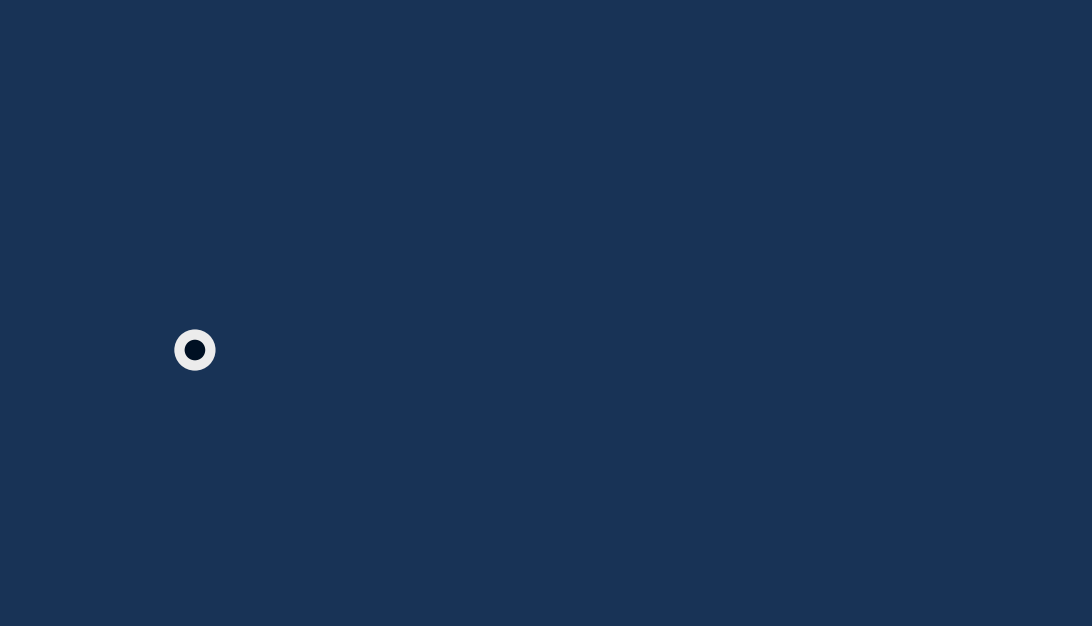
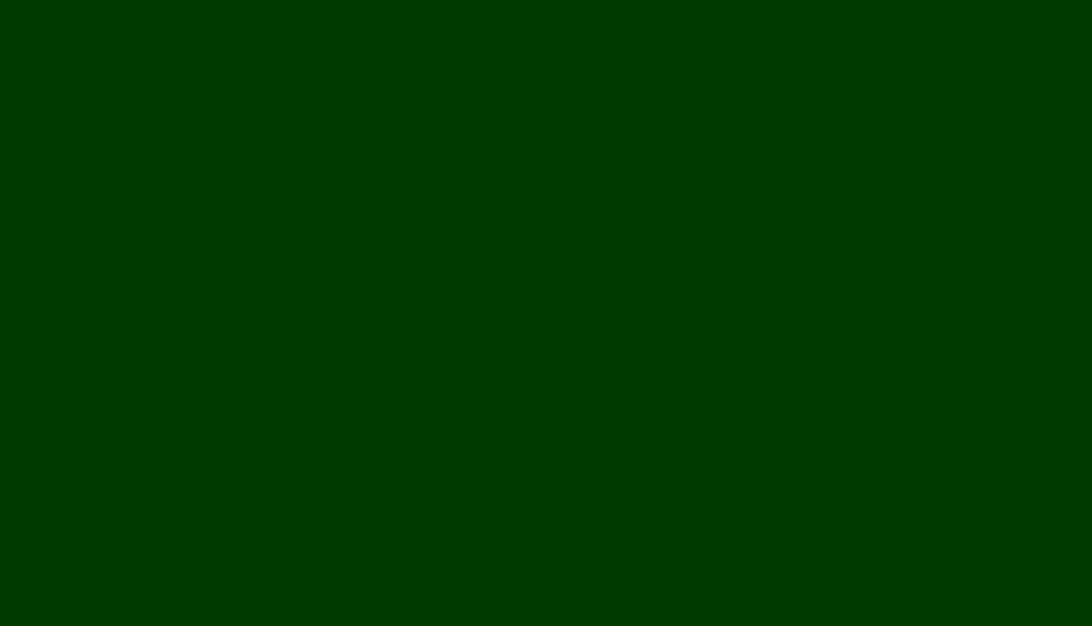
via: (194, 350) -> none

